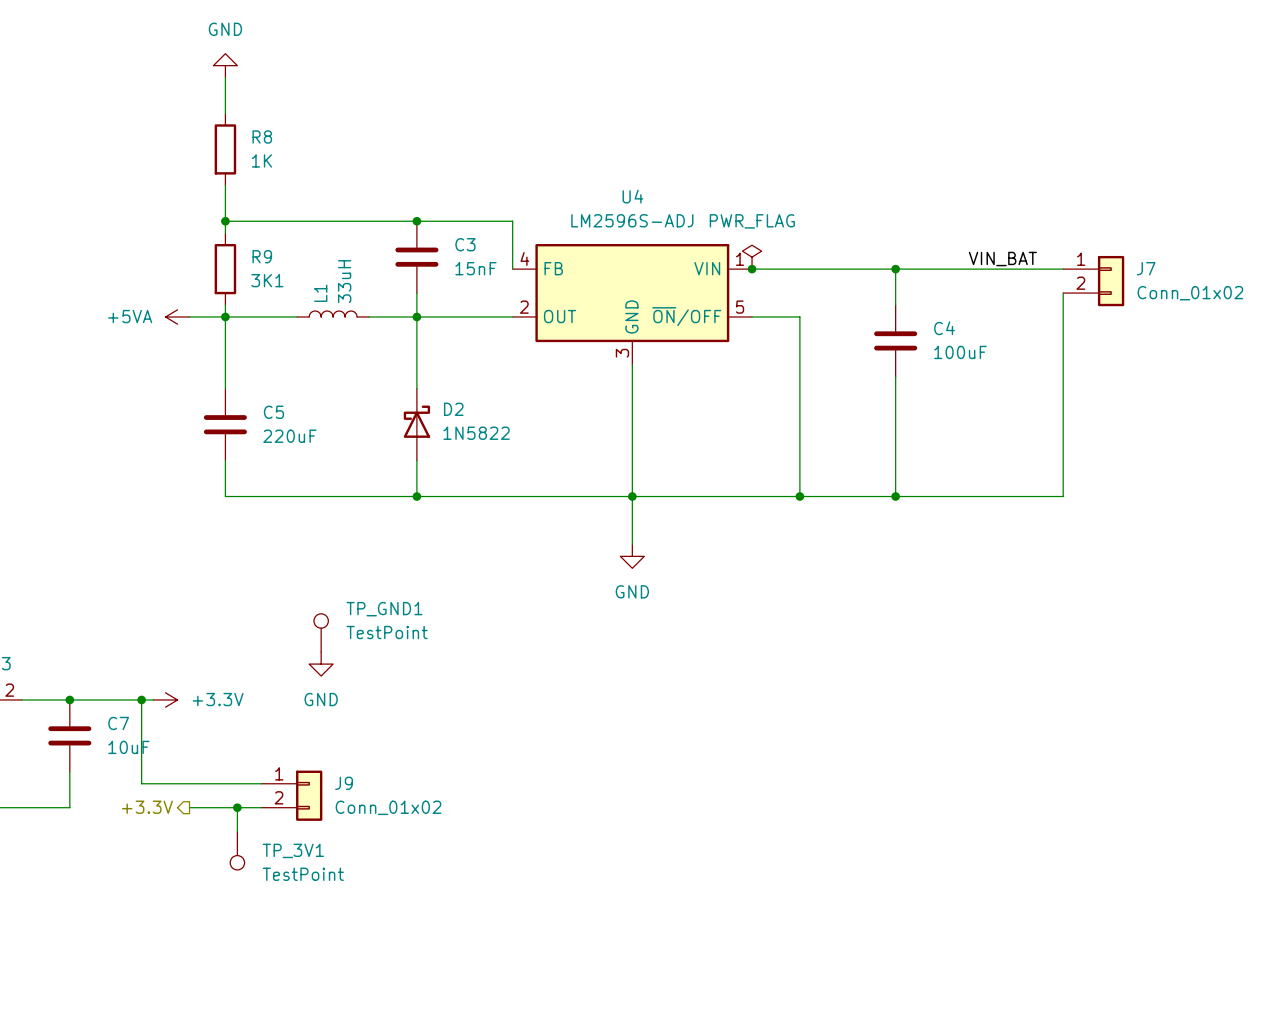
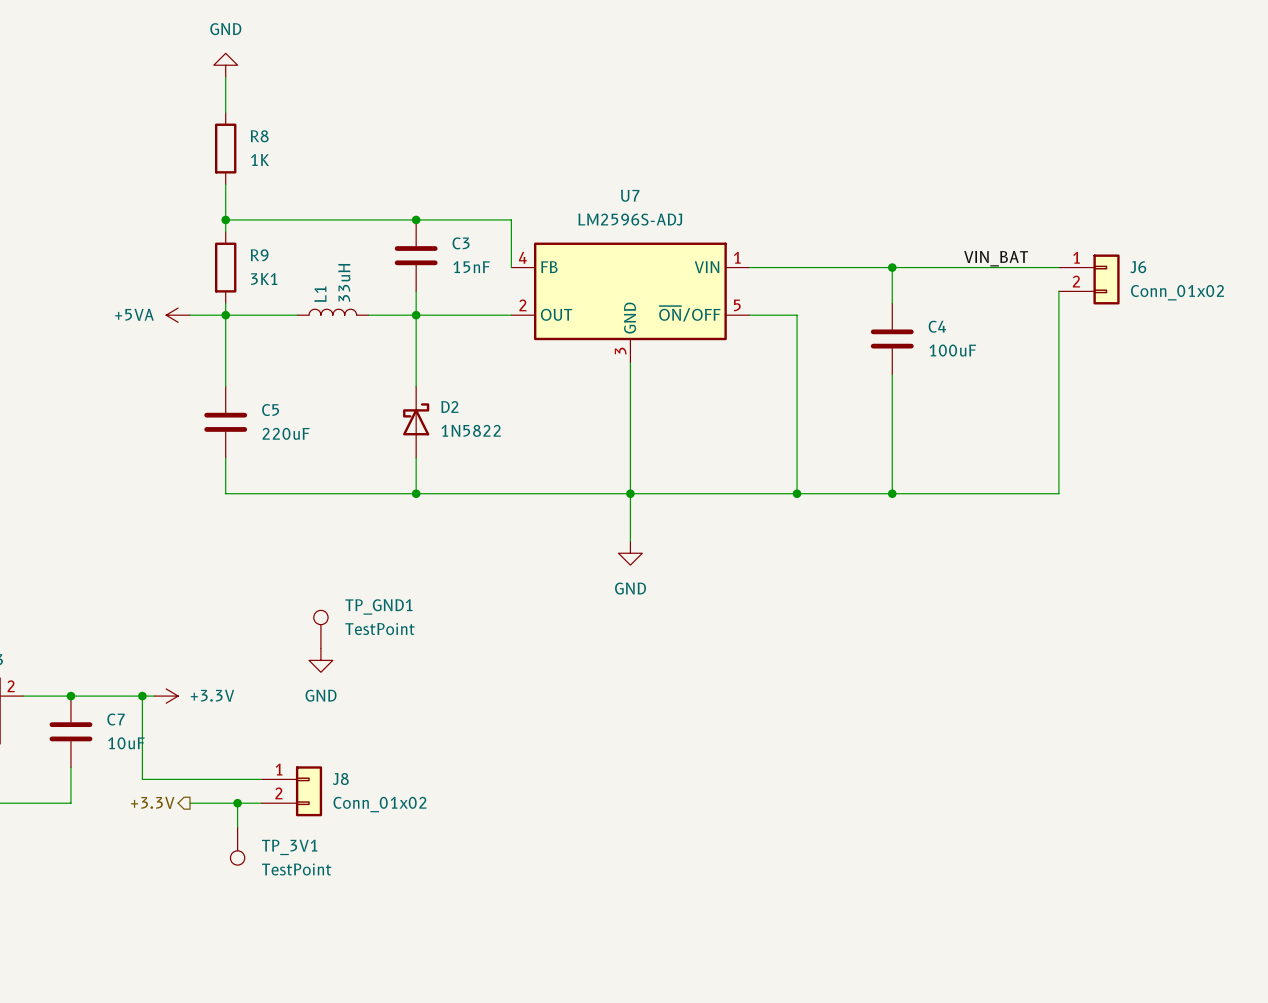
U4 name: U4 (632, 196) -> U7 (630, 195)
power symbol: PWR_FLAG (752, 257) -> none
J7 name: J7 (1146, 268) -> J6 (1138, 267)
junction: (752, 269) -> none
J9 name: J9 (344, 783) -> J8 (340, 779)

